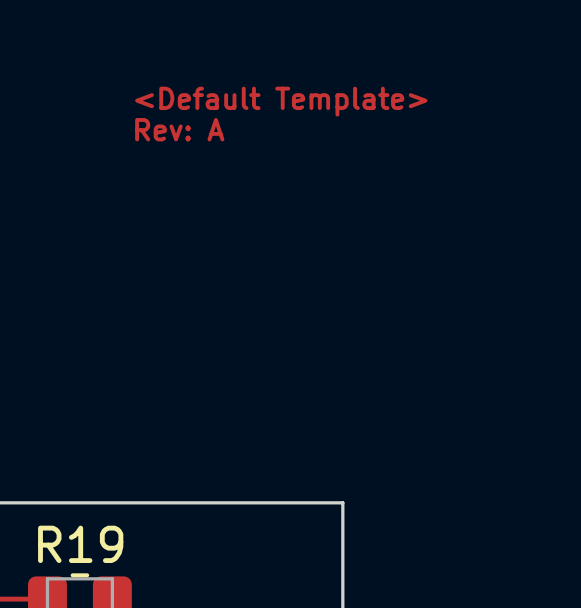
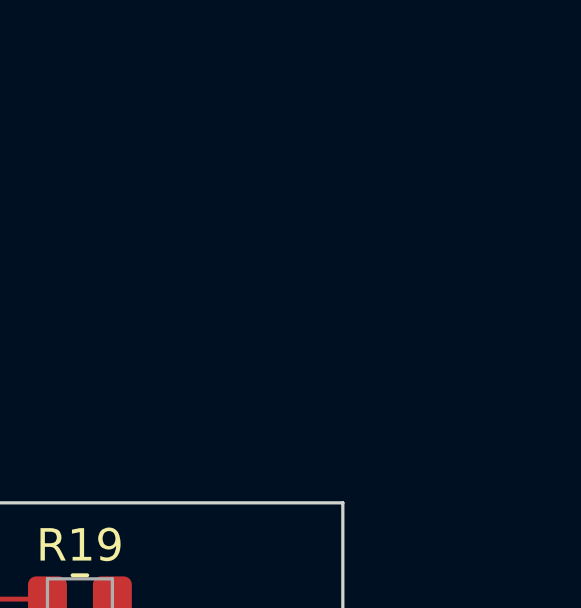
text: <Default Template> (281, 101) -> none
text: Rev: A (179, 129) -> none

